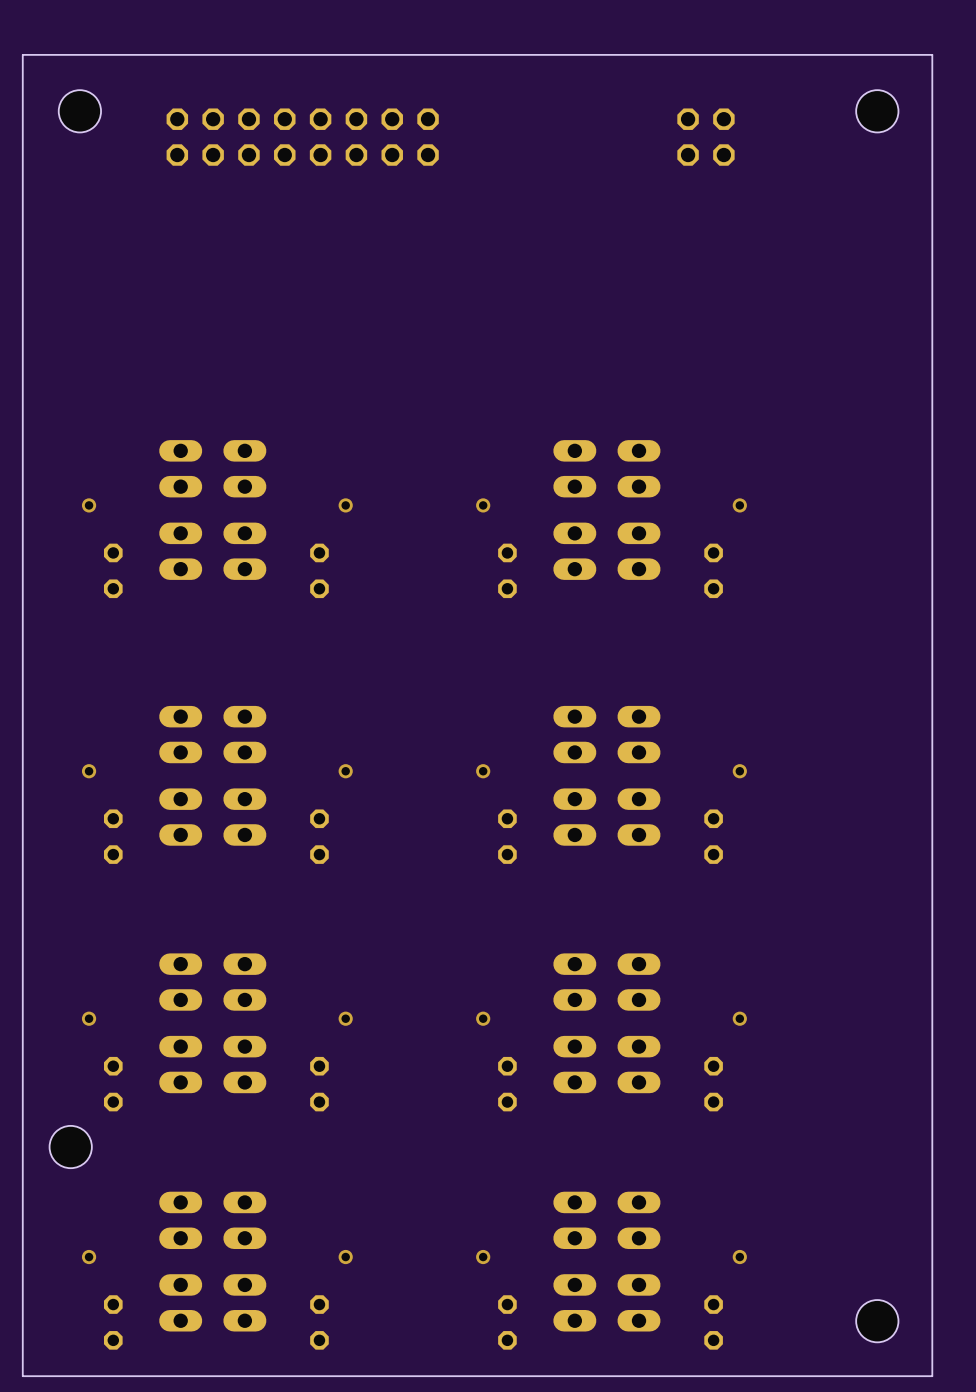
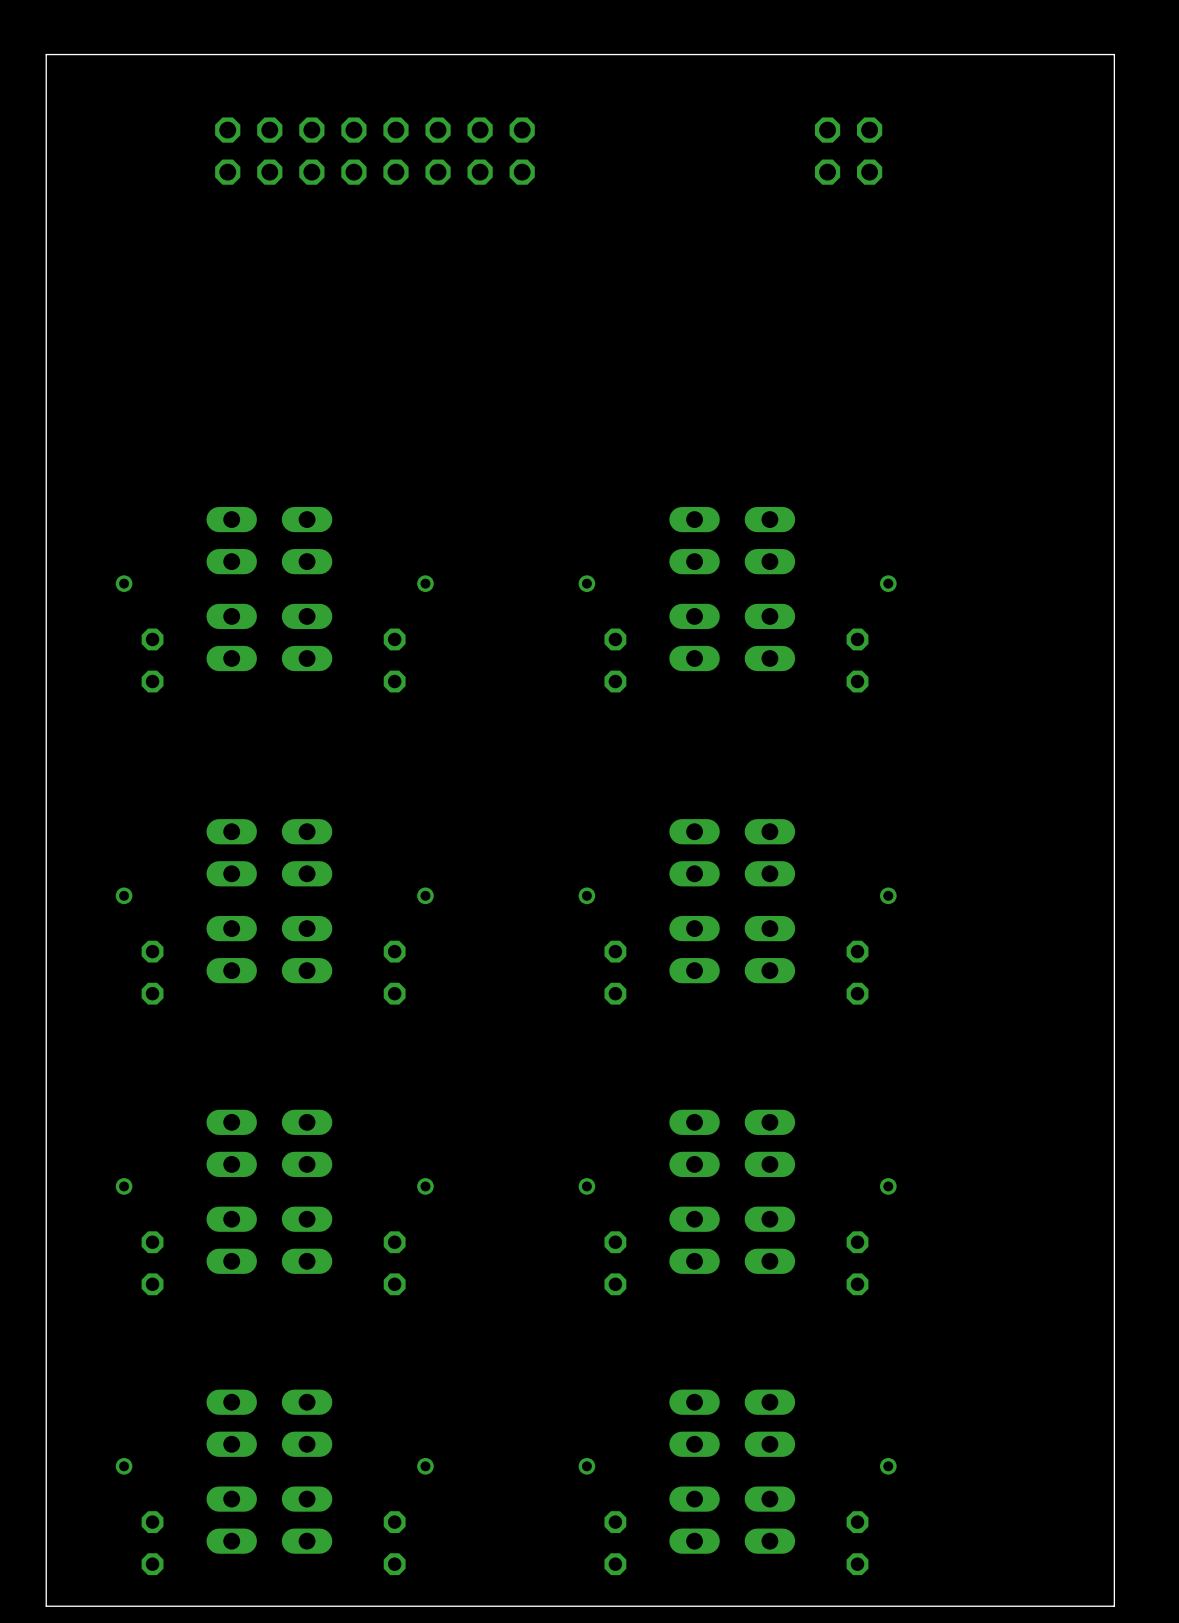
hole: (79, 111) -> none
hole: (877, 111) -> none
hole: (70, 1147) -> none
hole: (877, 1321) -> none

